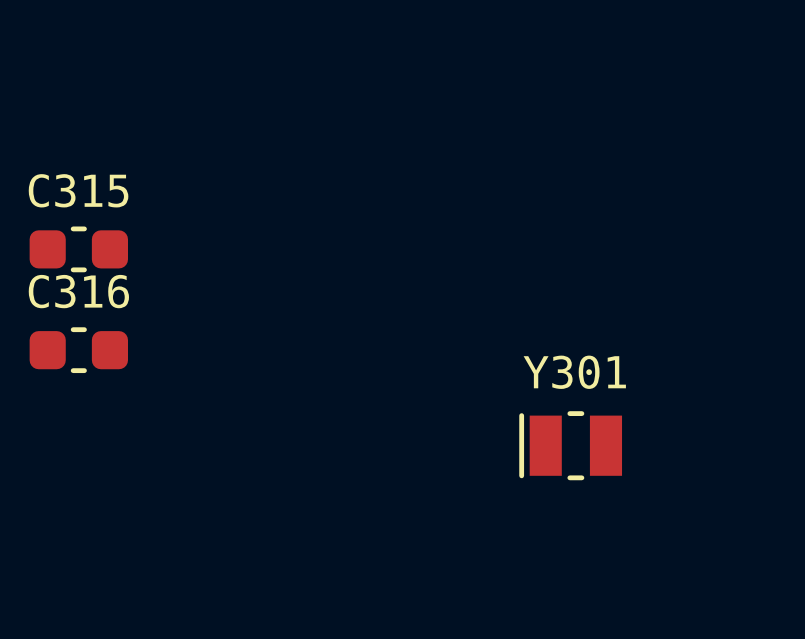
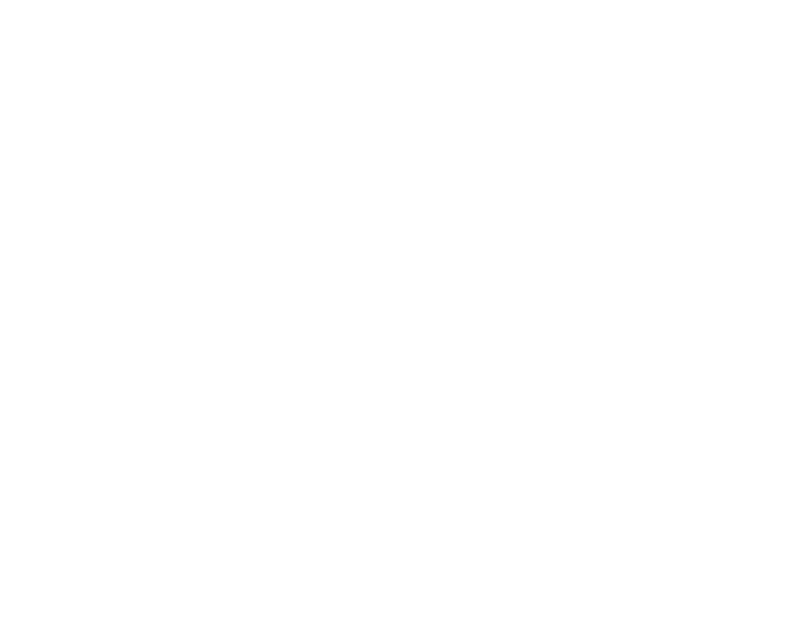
C315: (78, 249) -> none
C316: (78, 350) -> none
Y301: (570, 445) -> none

